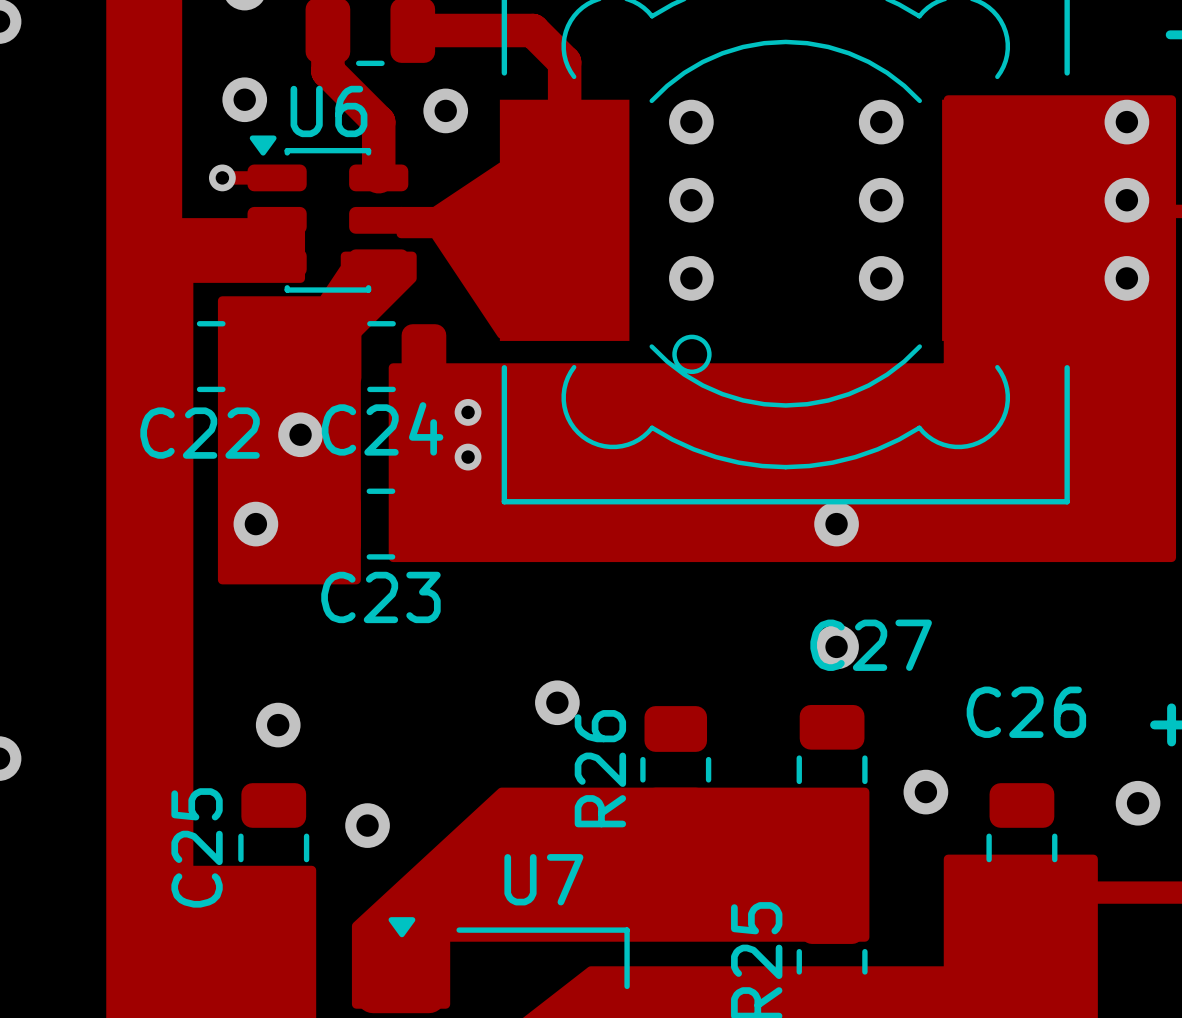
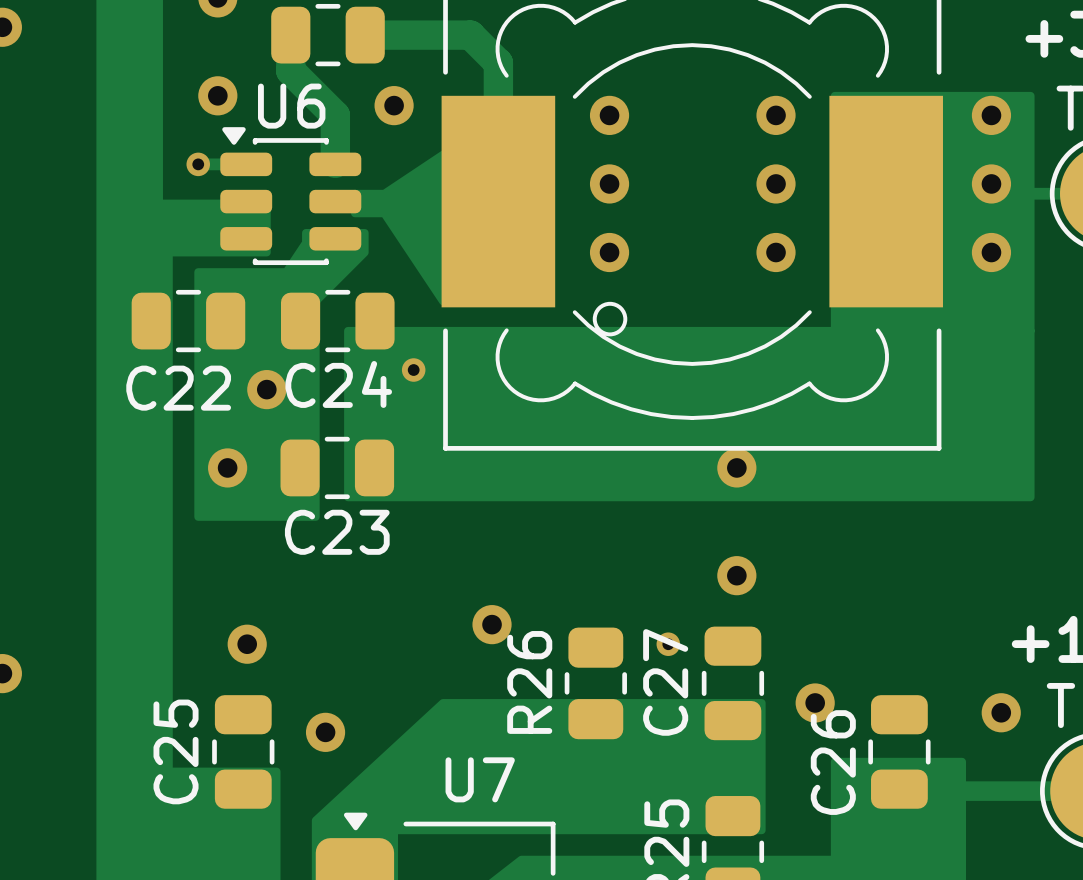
via: (468, 457) -> none
C27 name rotation: 0° (871, 645) -> 90° counterclockwise (665, 682)
C27 name position: C27 (871, 645) -> C27 (665, 682)
C26 name rotation: 0° (1026, 712) -> 90° counterclockwise (833, 762)
C26 name position: C26 (1026, 712) -> C26 (833, 762)
via: none -> (668, 644)

